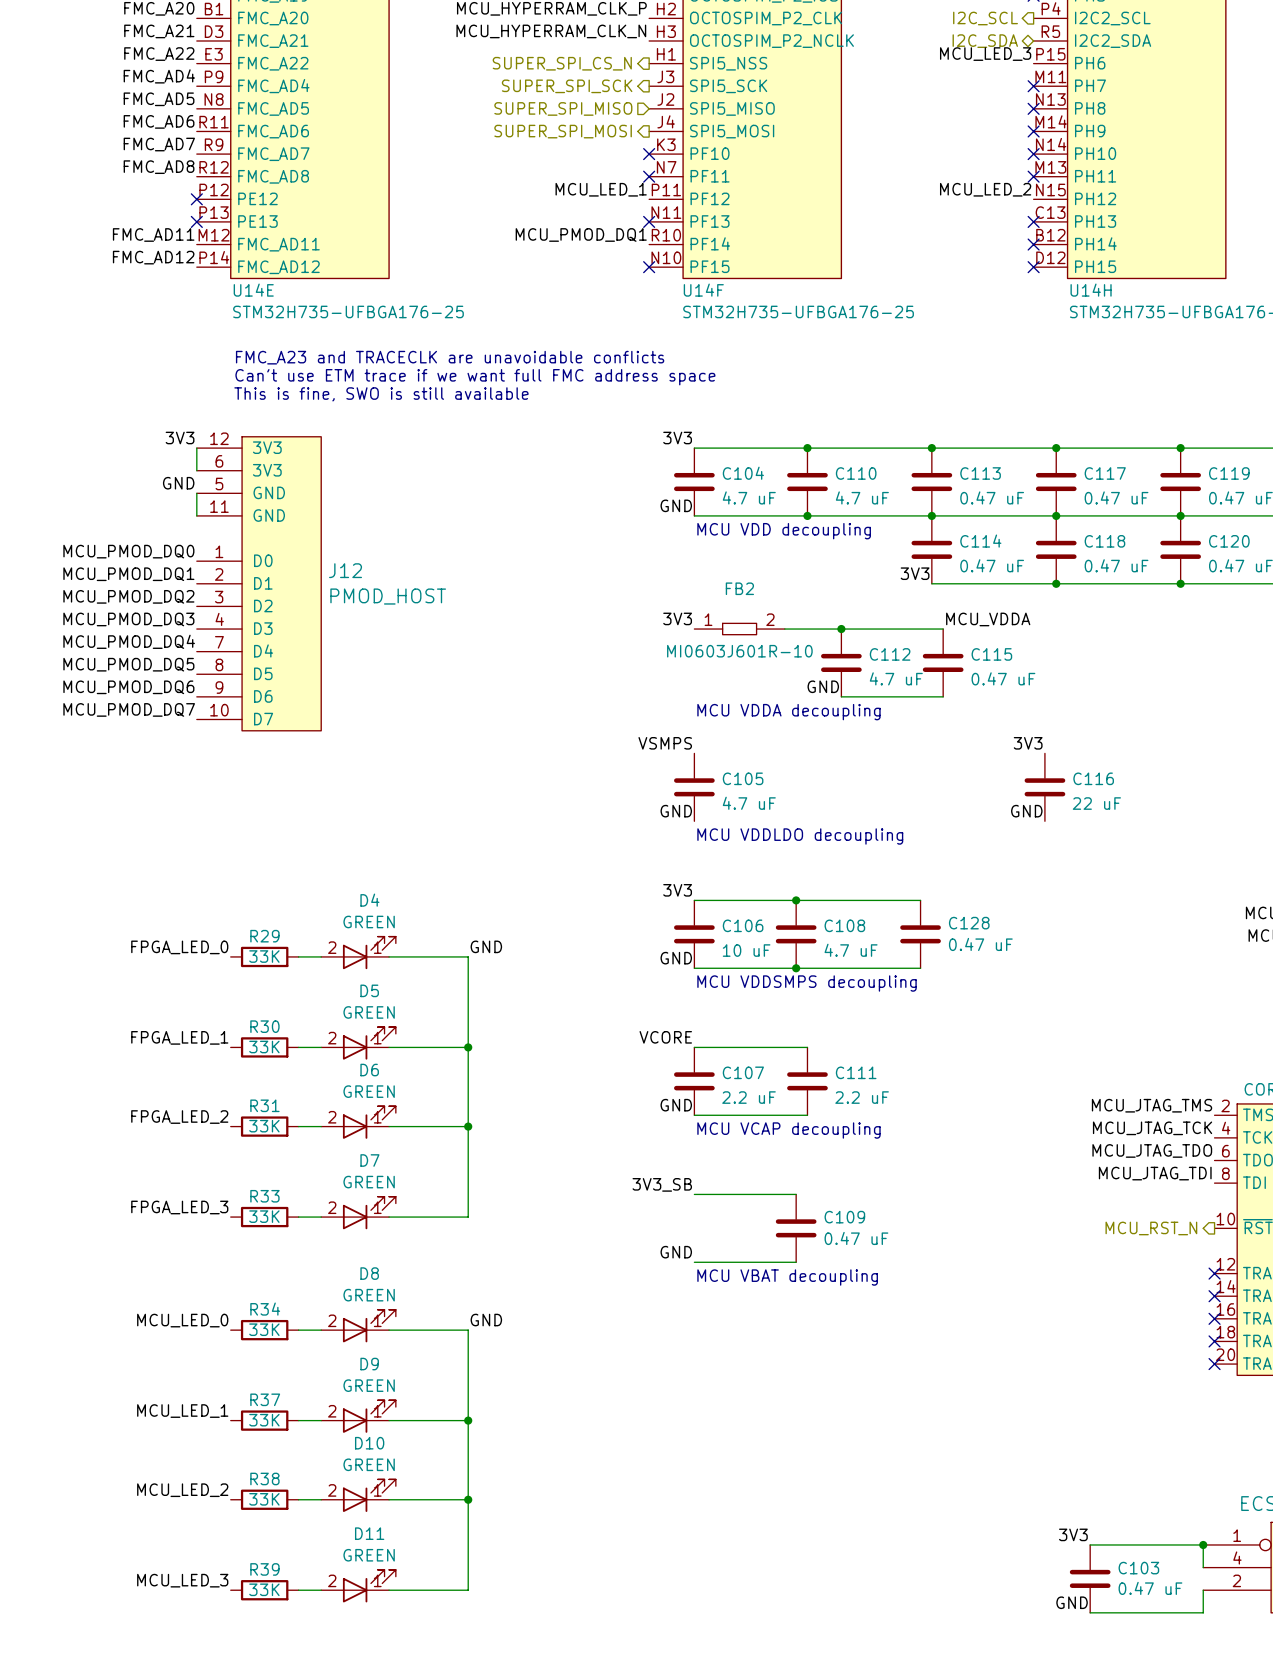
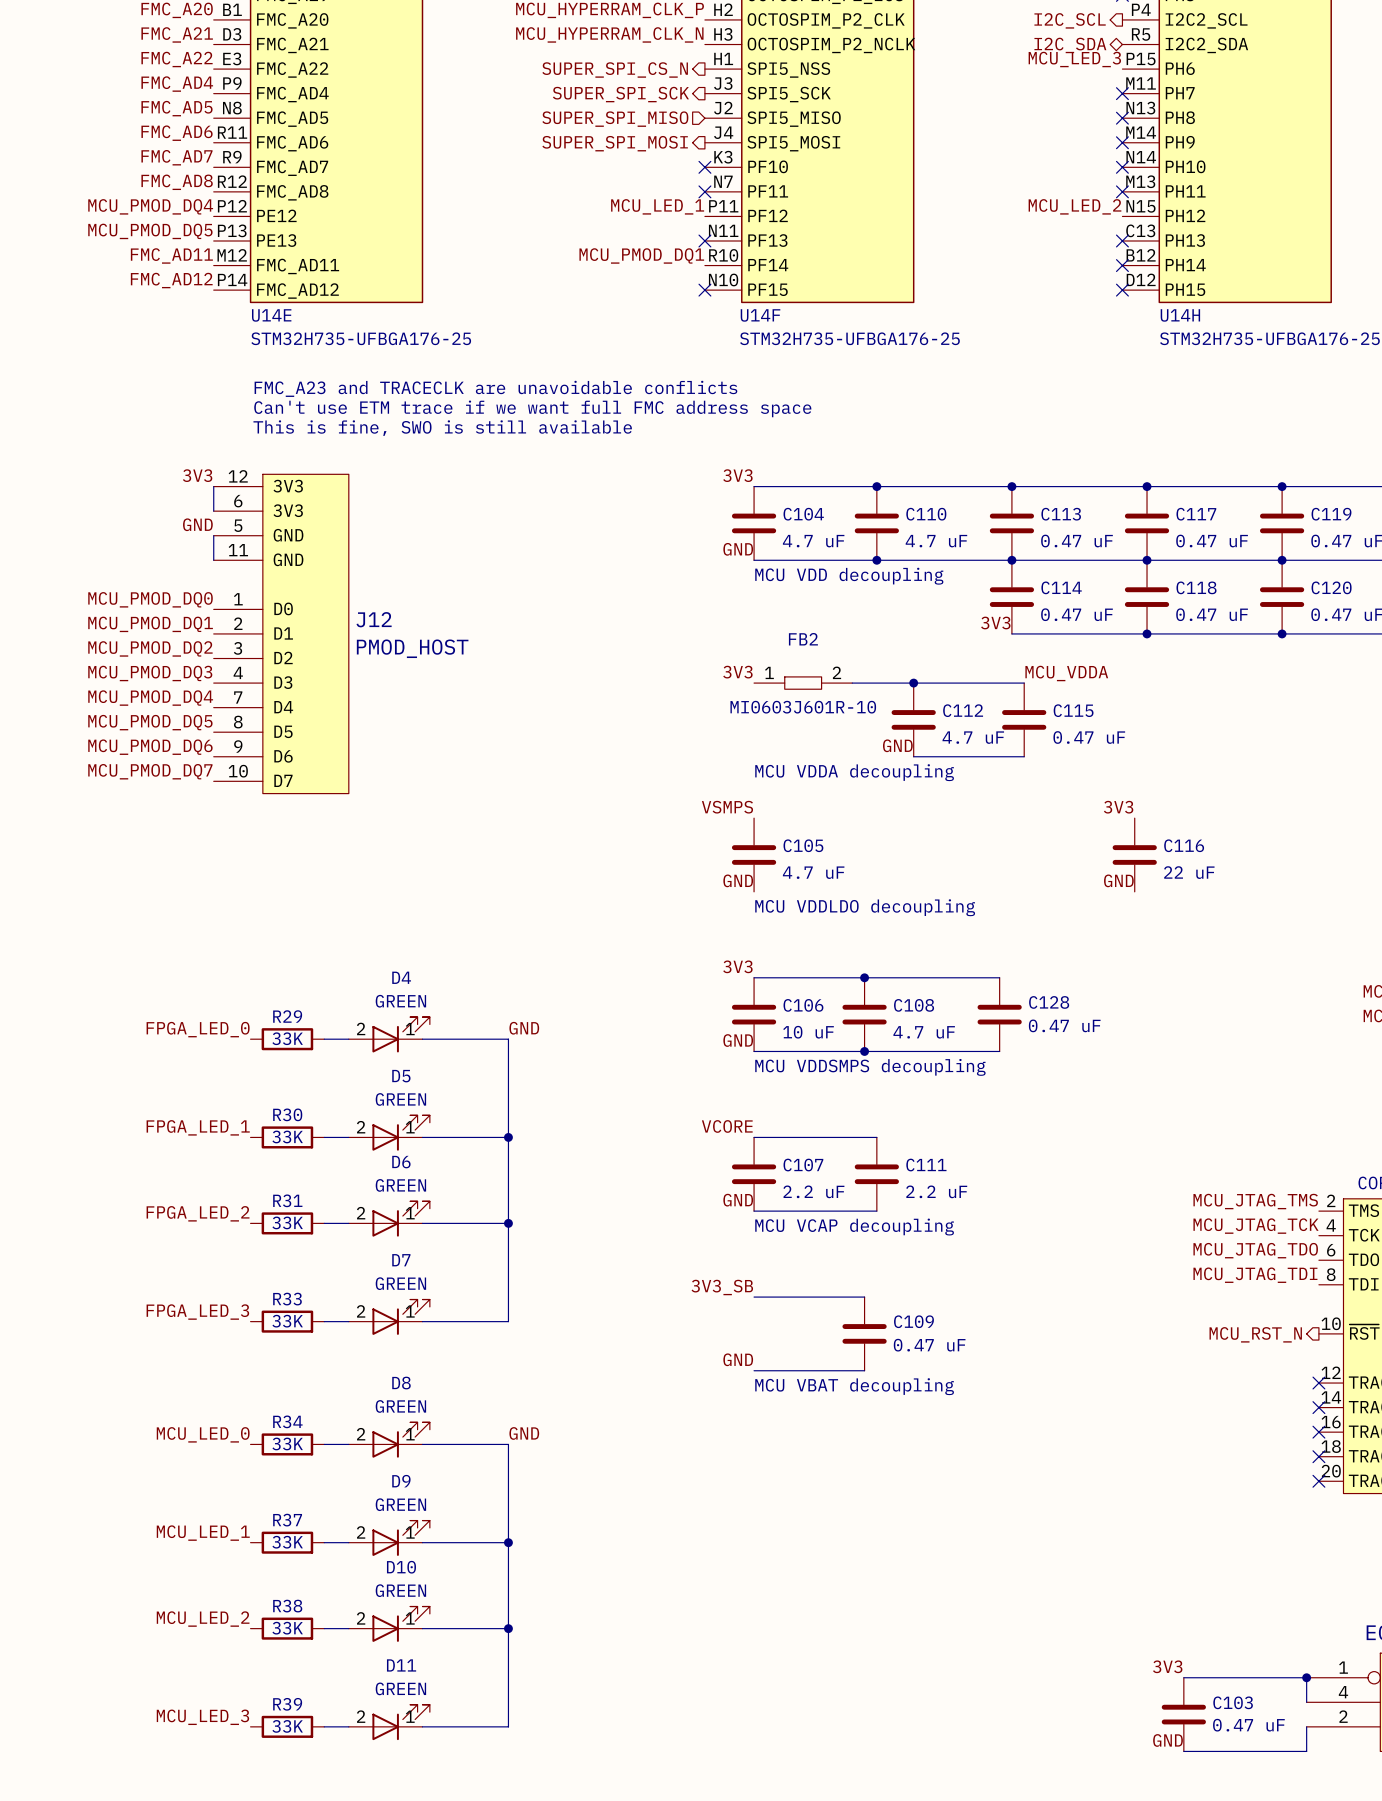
label: none -> MCU_PMOD_DQ4 (150, 206)
no-connect mark: (196, 199) -> none
label: none -> MCU_PMOD_DQ5 (150, 231)
no-connect mark: (196, 221) -> none

